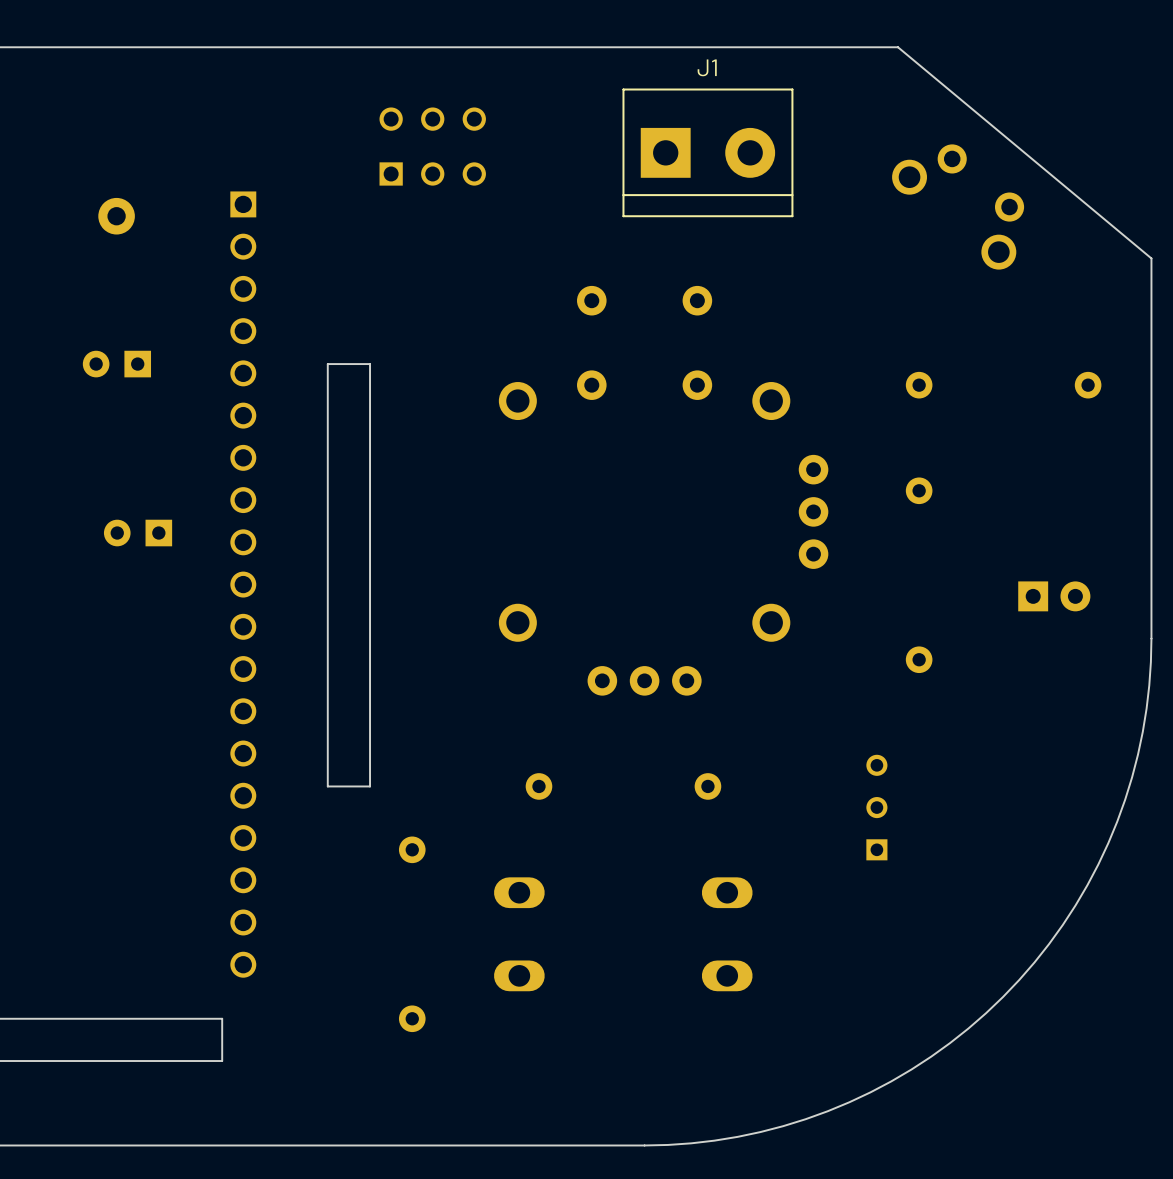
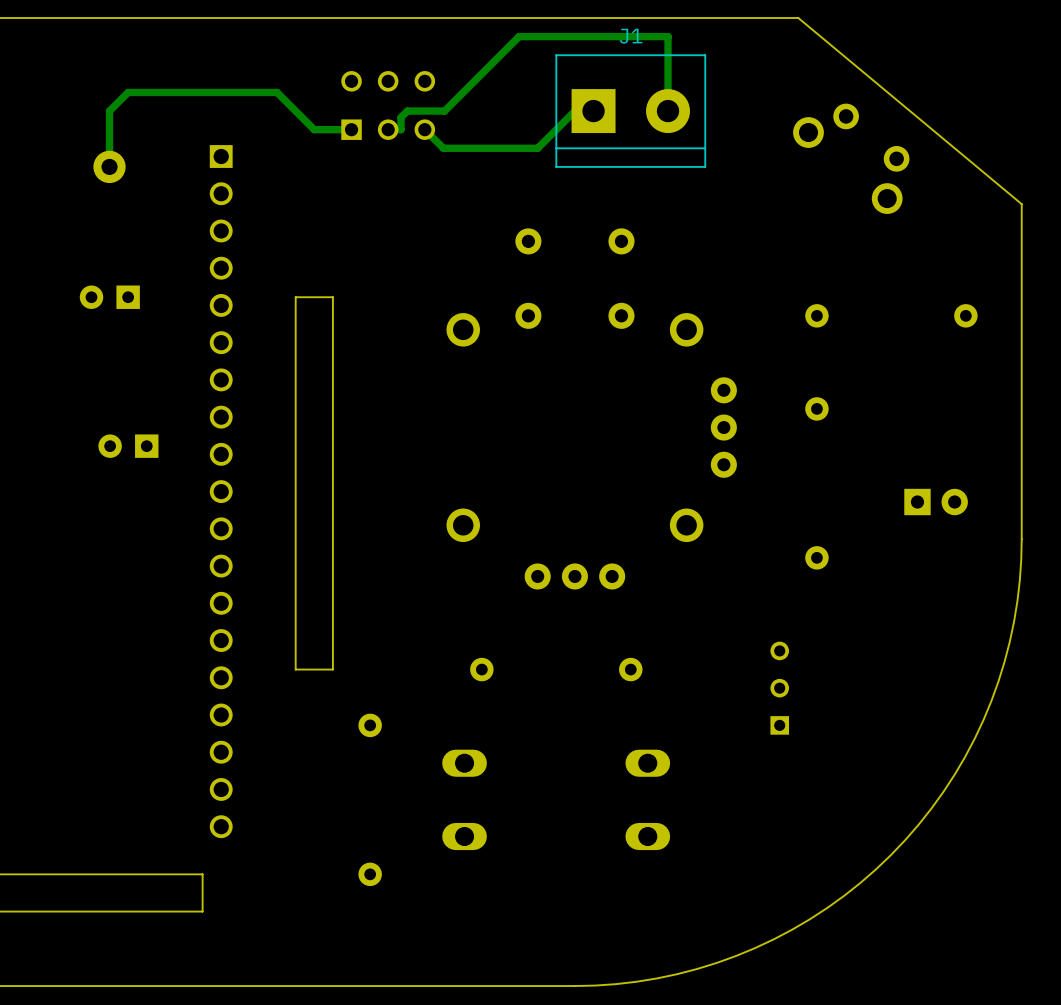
bottom track: none -> (593, 92) (537, 148) (443, 148) (424, 129)
bottom track: none -> (668, 92) (668, 36) (519, 36) (444, 111) (407, 111) (401, 117) (401, 129) (388, 129)
bottom track: none -> (351, 129) (314, 129) (277, 92) (128, 92) (109, 111) (109, 166)

